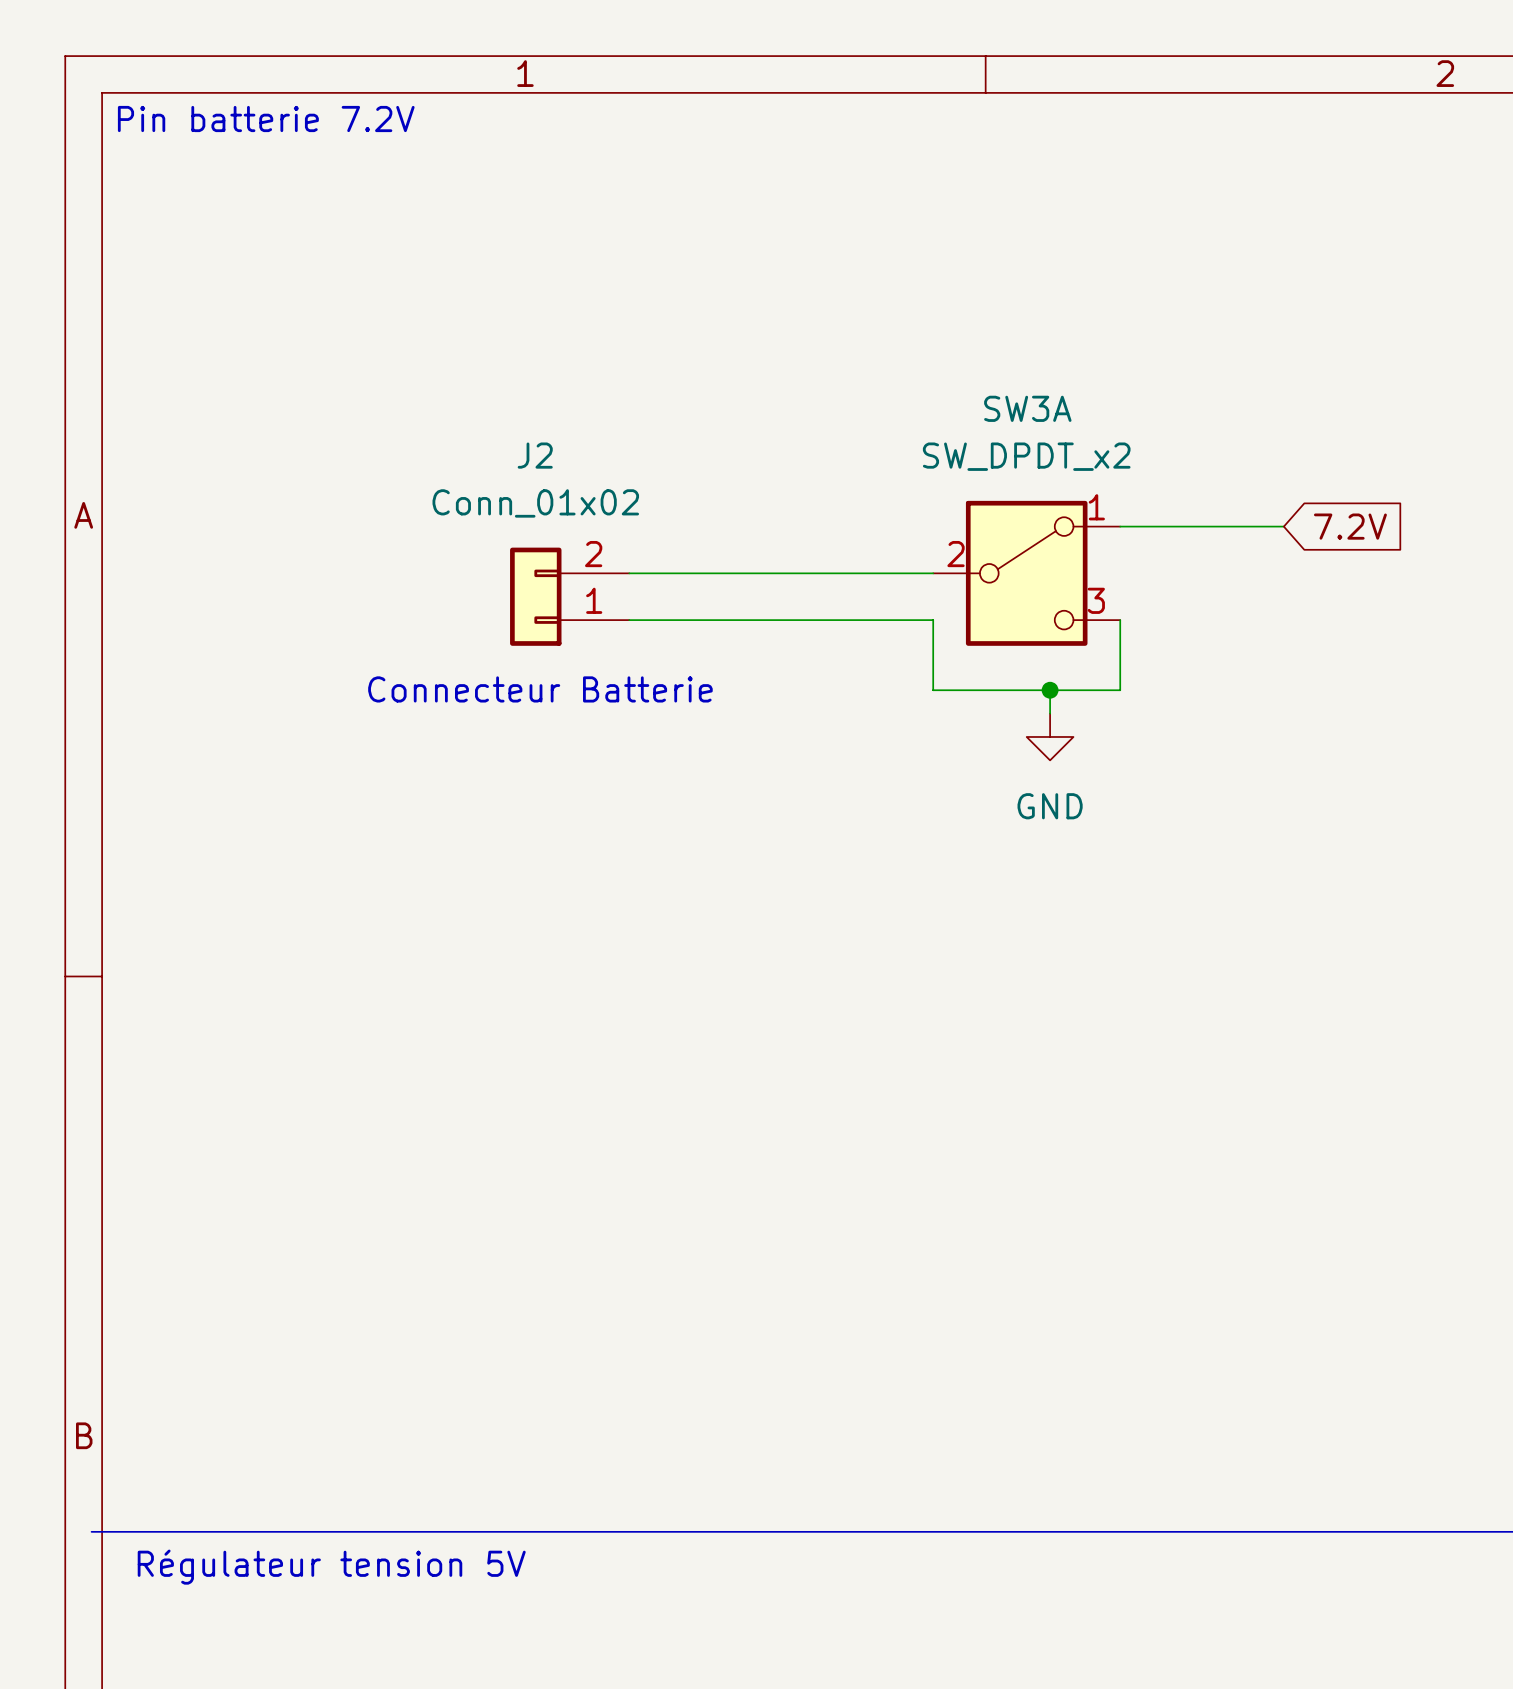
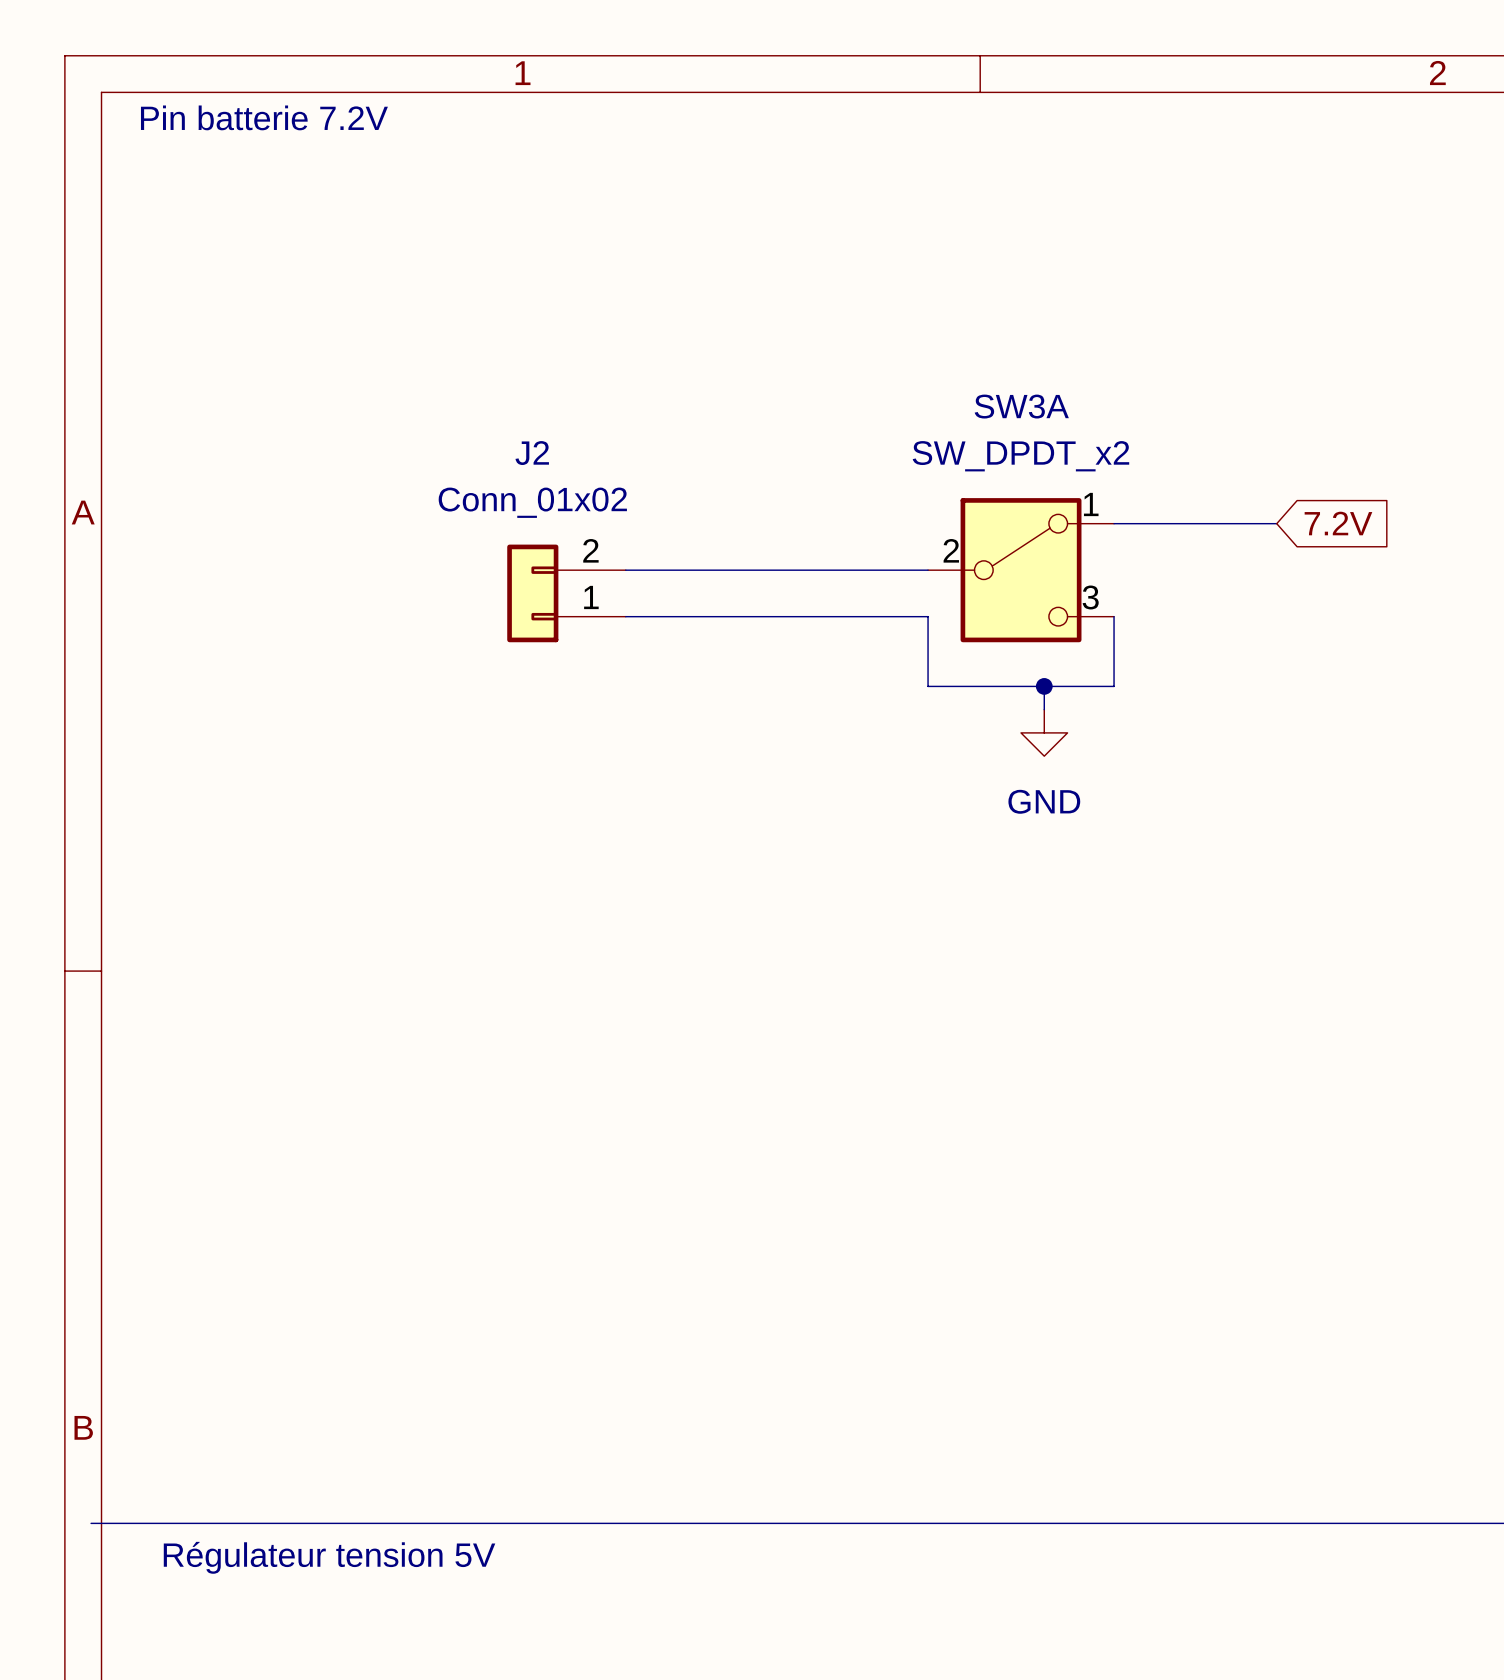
text: Connecteur Batterie (540, 689) -> none

